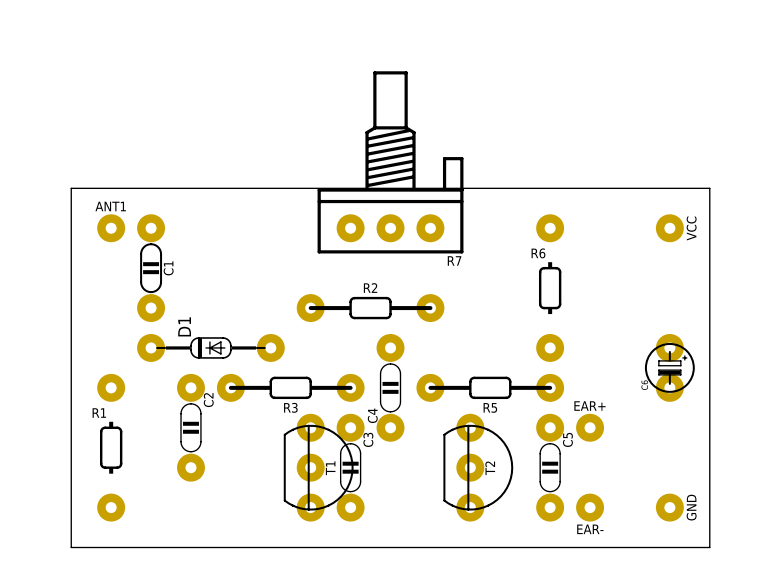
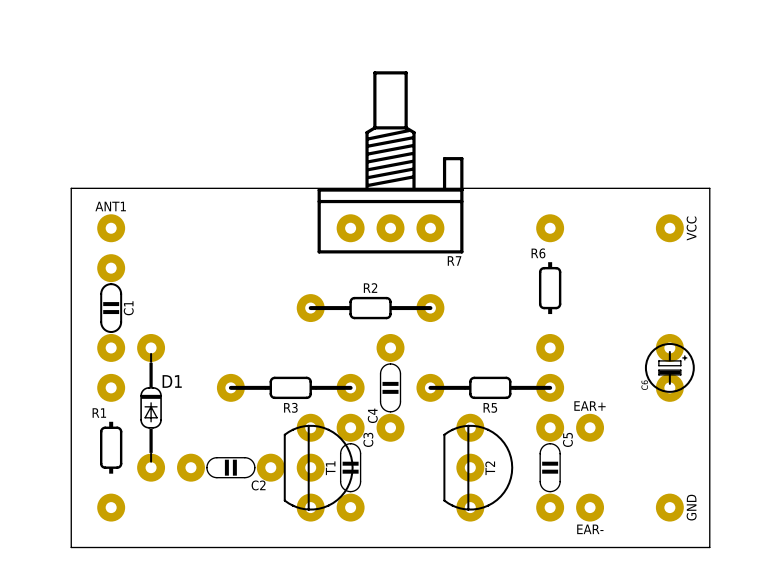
C1 position: (151, 268) -> (111, 308)
D1 rotation: 0° (210, 347) -> 90° clockwise (151, 407)
C2 rotation: 0° (190, 427) -> 90° clockwise (230, 467)

